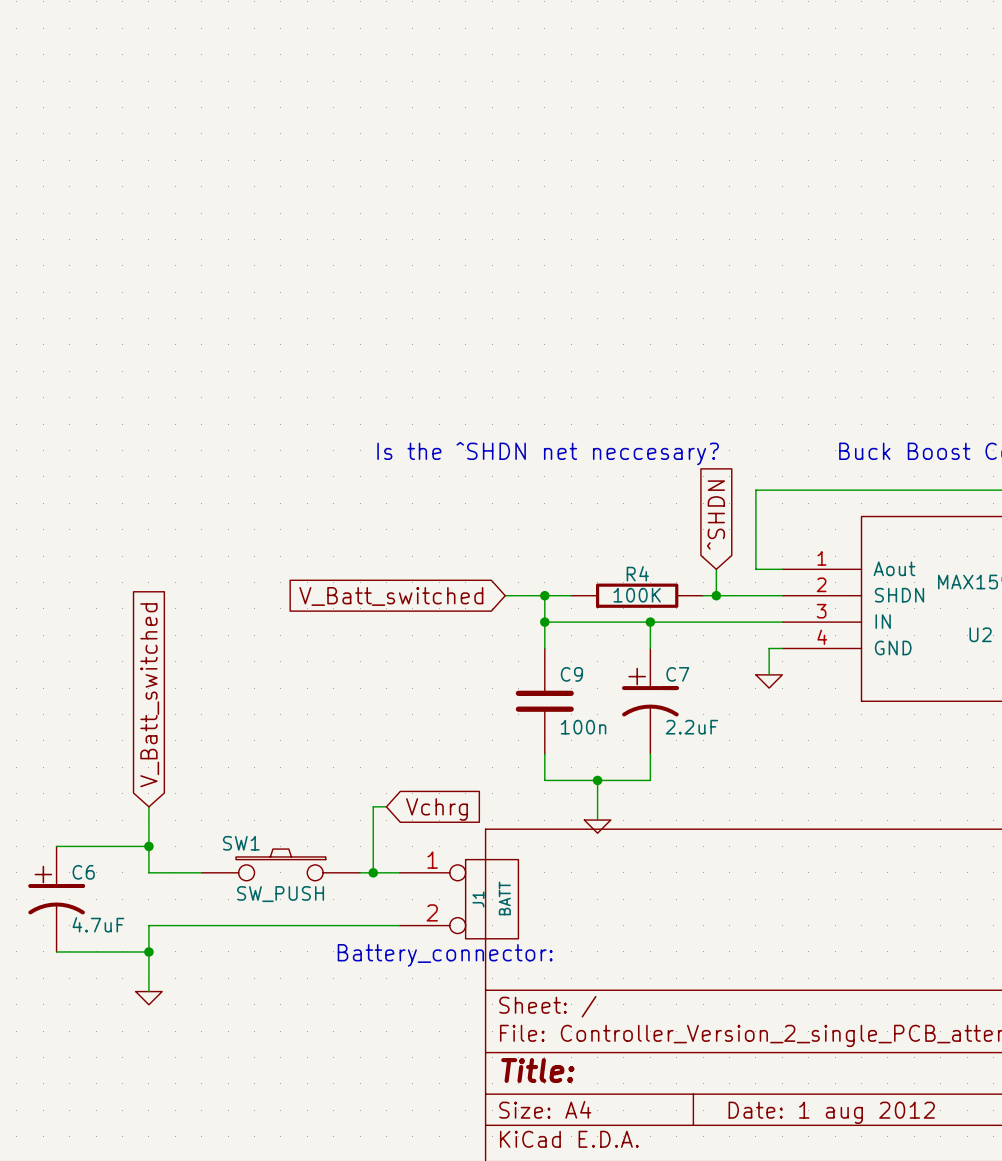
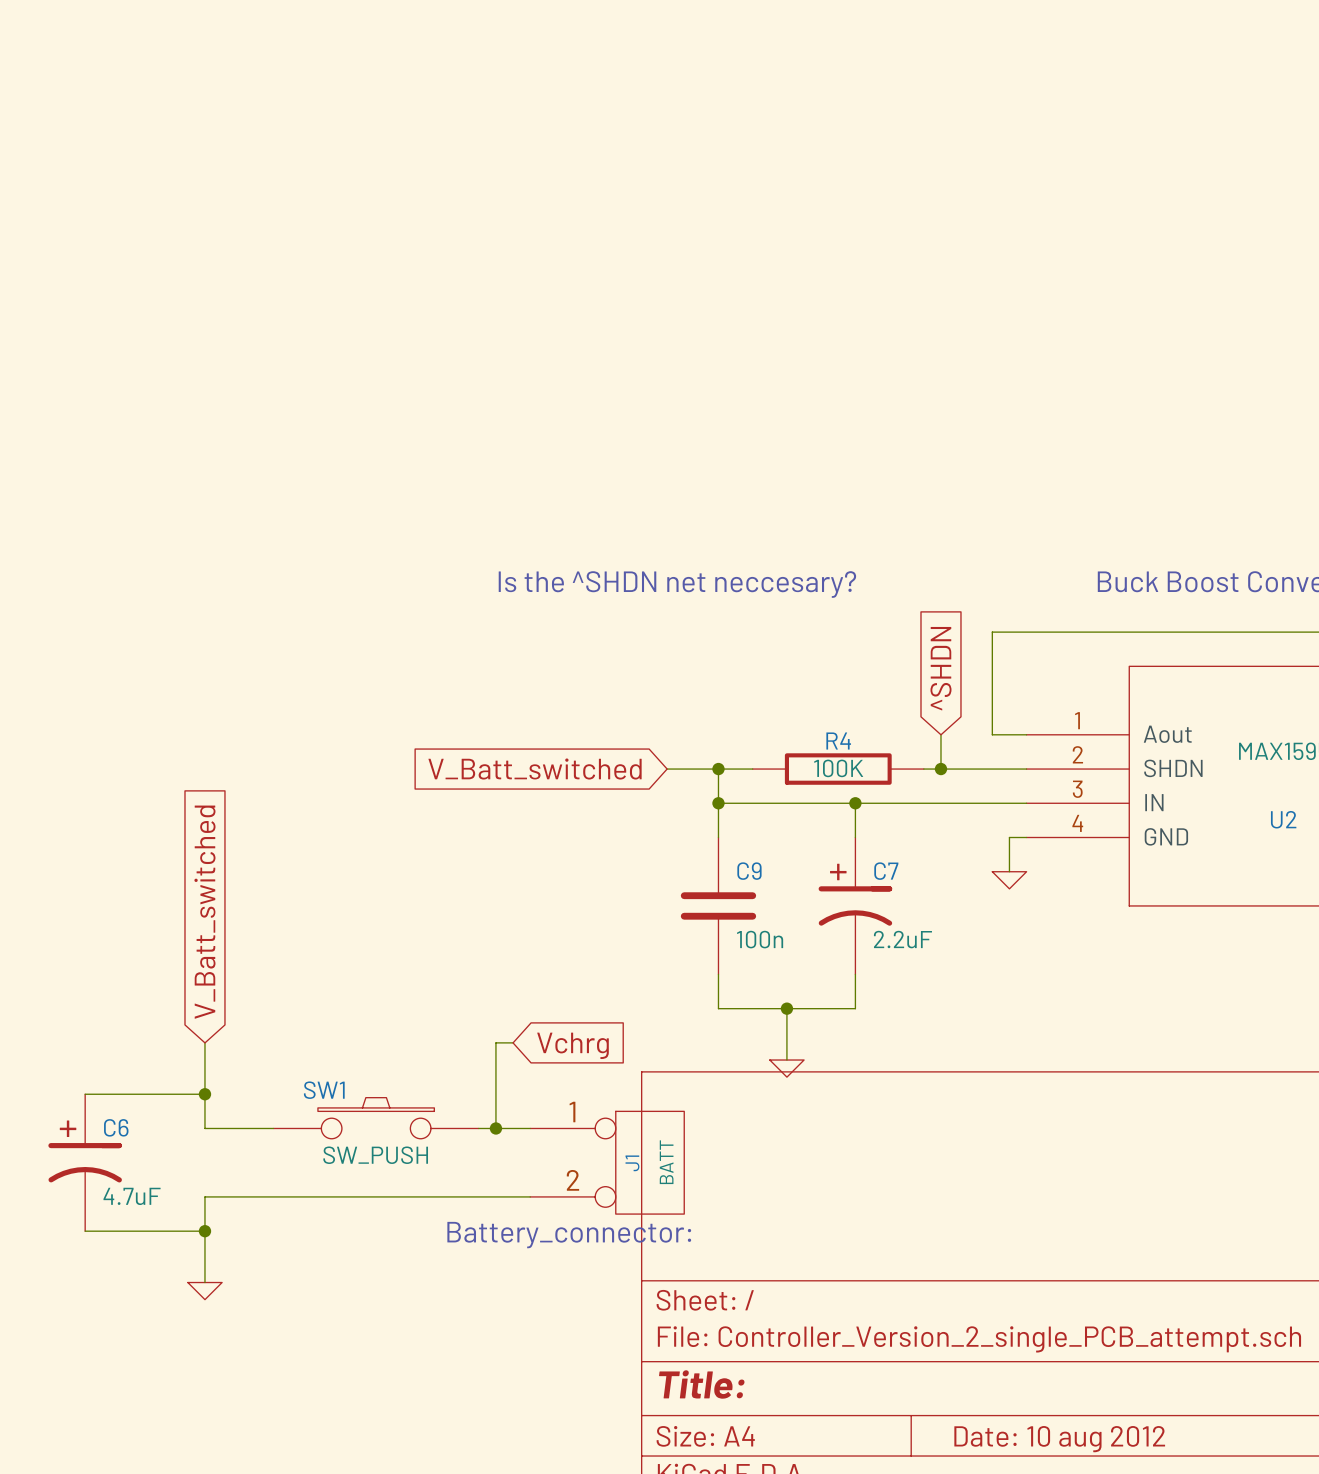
title block: Date: 1 aug 2012 (831, 1112) -> Date: 10 aug 2012 (1059, 1439)

